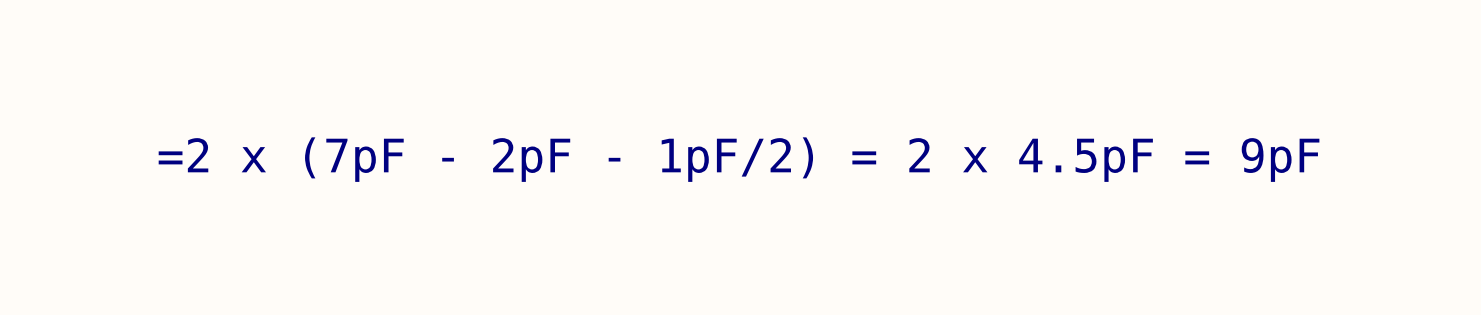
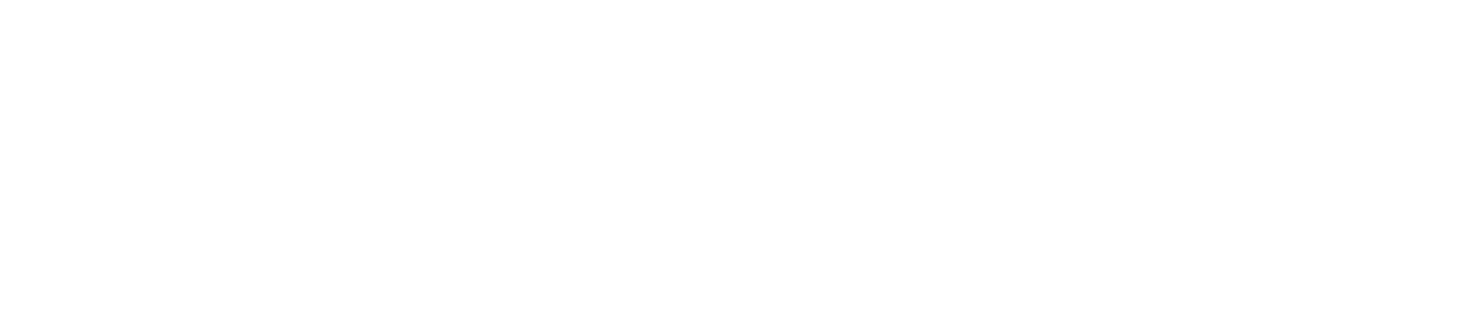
text: =2 x (7pF - 2pF - 1pF/2) = 2 x 4.5pF = 9pF (739, 159) -> none

